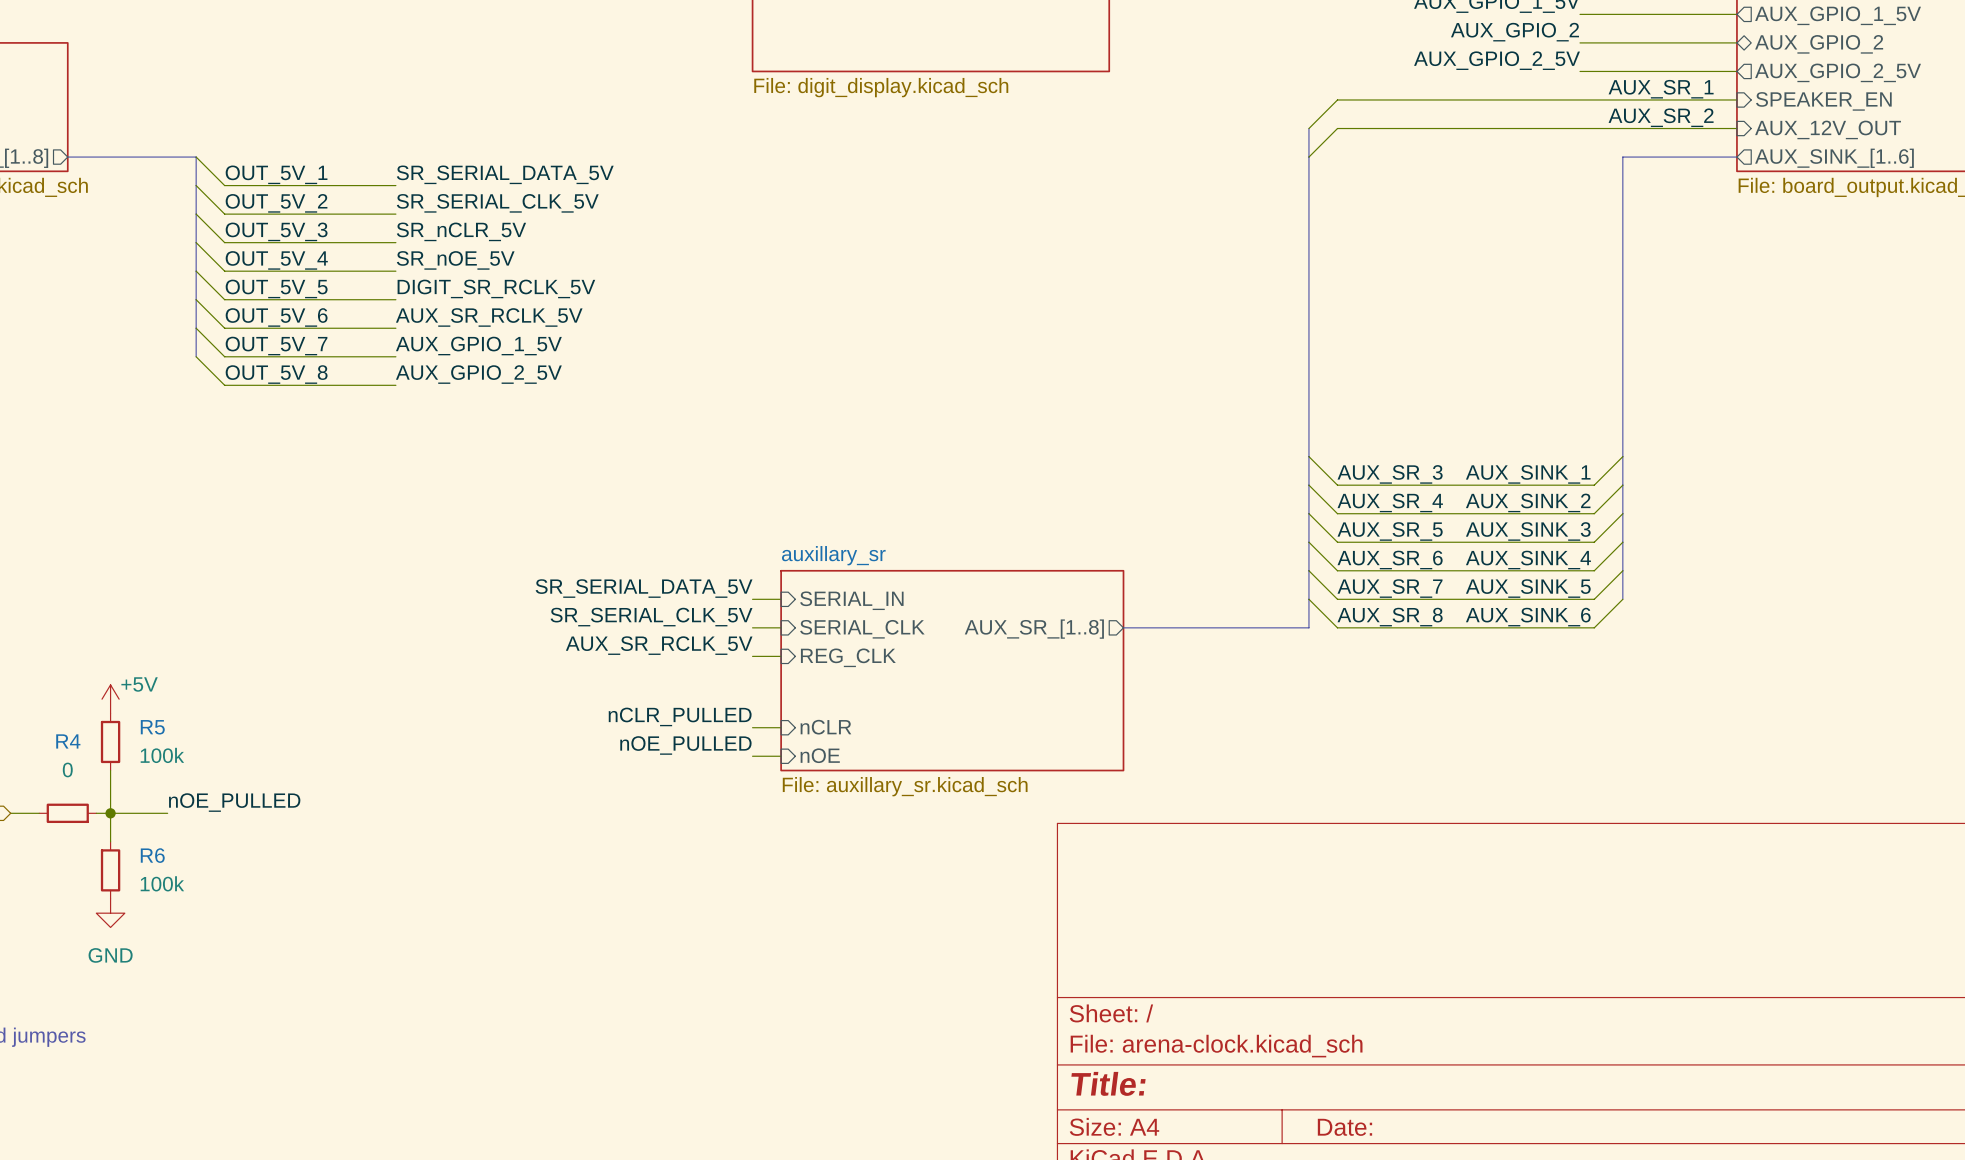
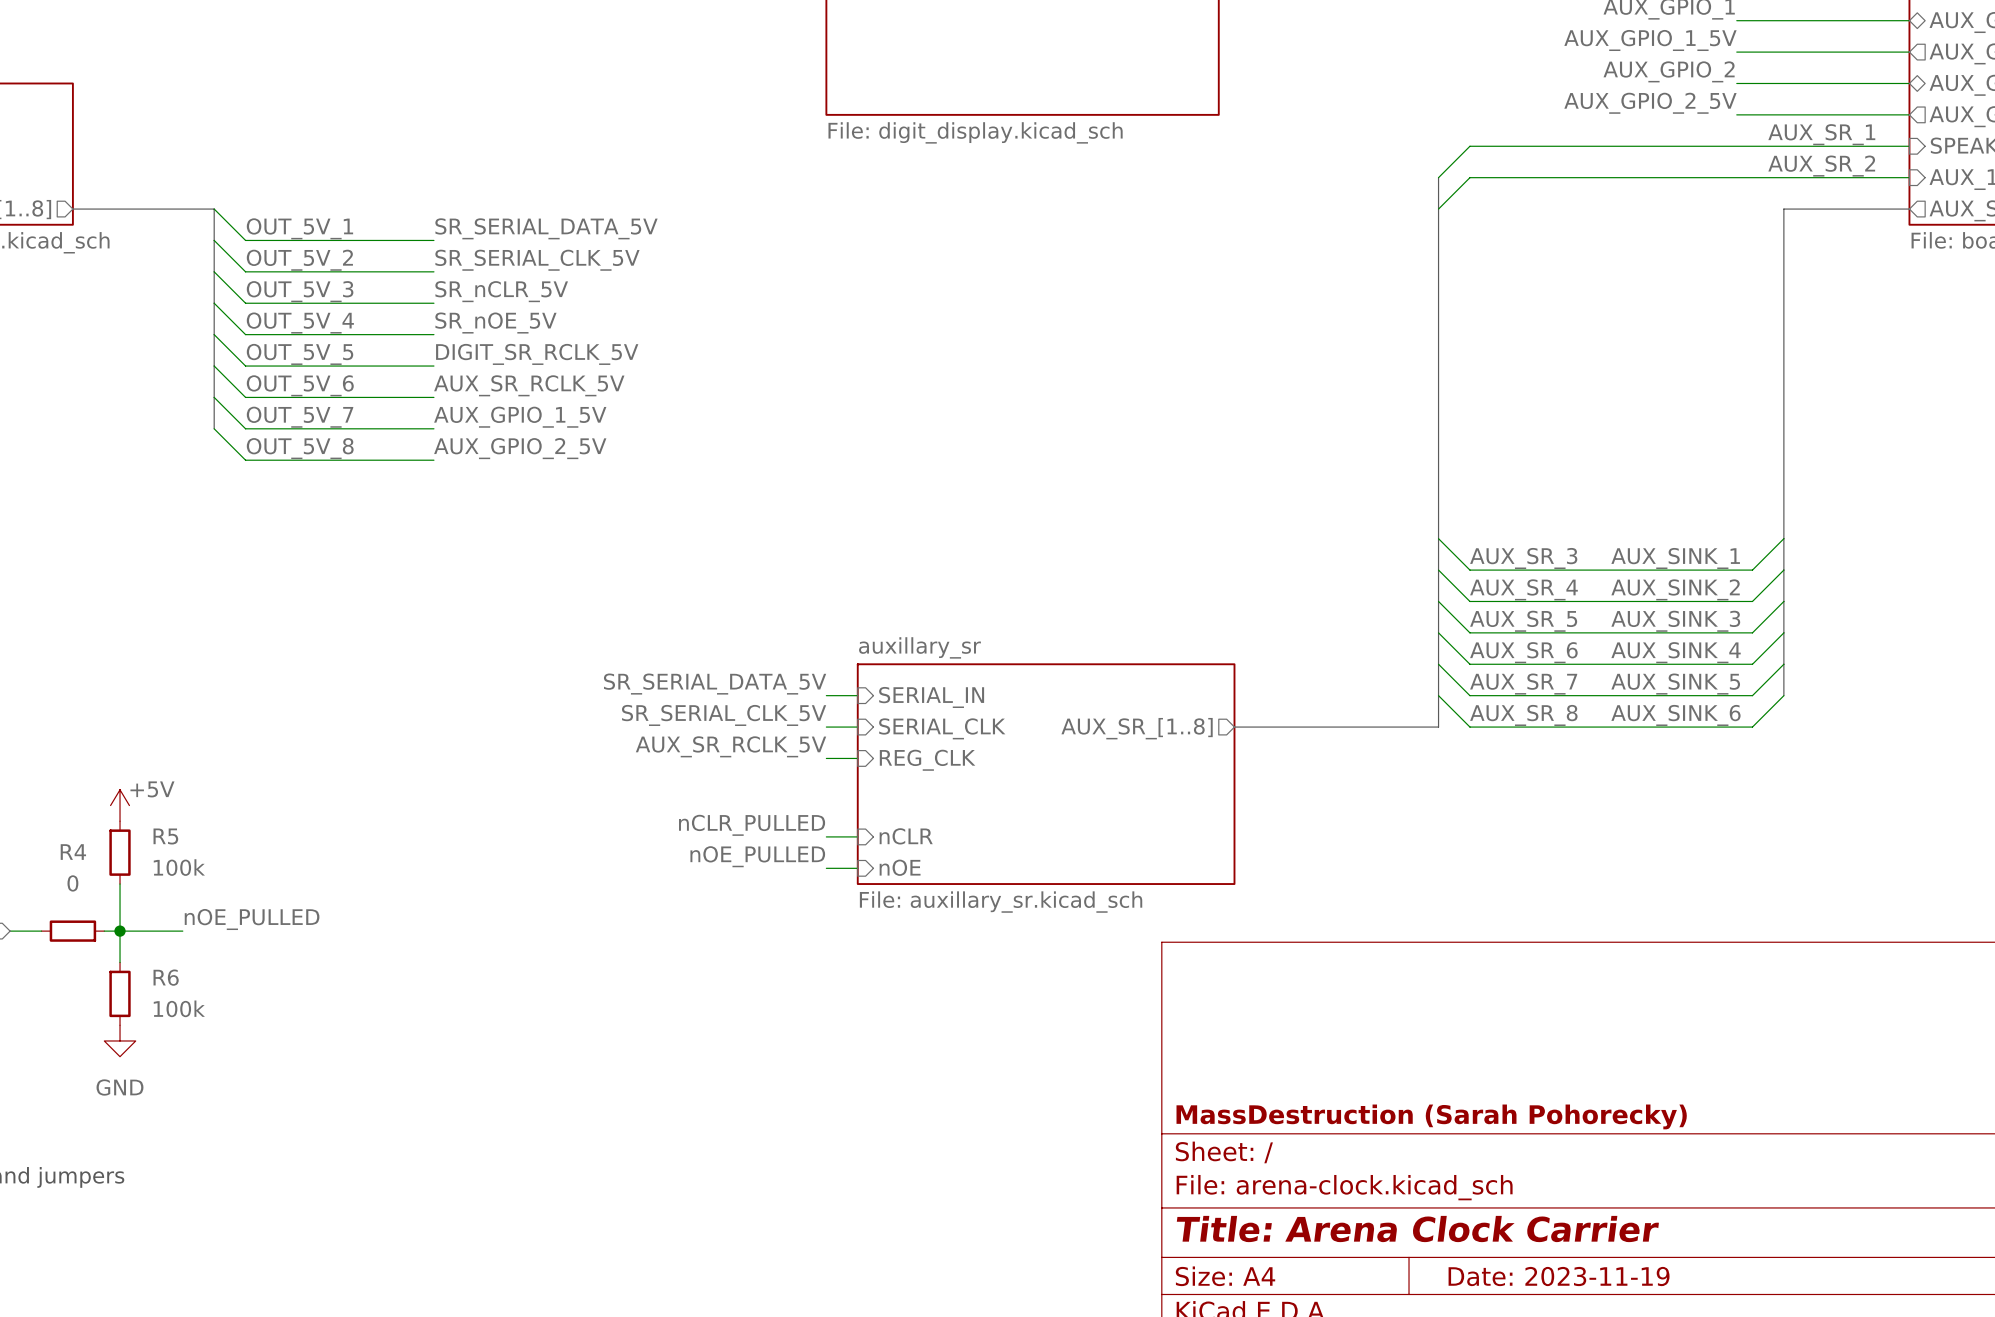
title block: none -> MassDestruction (Sarah Pohorecky) (1431, 1116)
title block: Title: (1108, 1083) -> Title: Arena Clock Carrier (1417, 1229)
title block: Date: (1344, 1127) -> Date: 2023-11-19 (1559, 1276)

